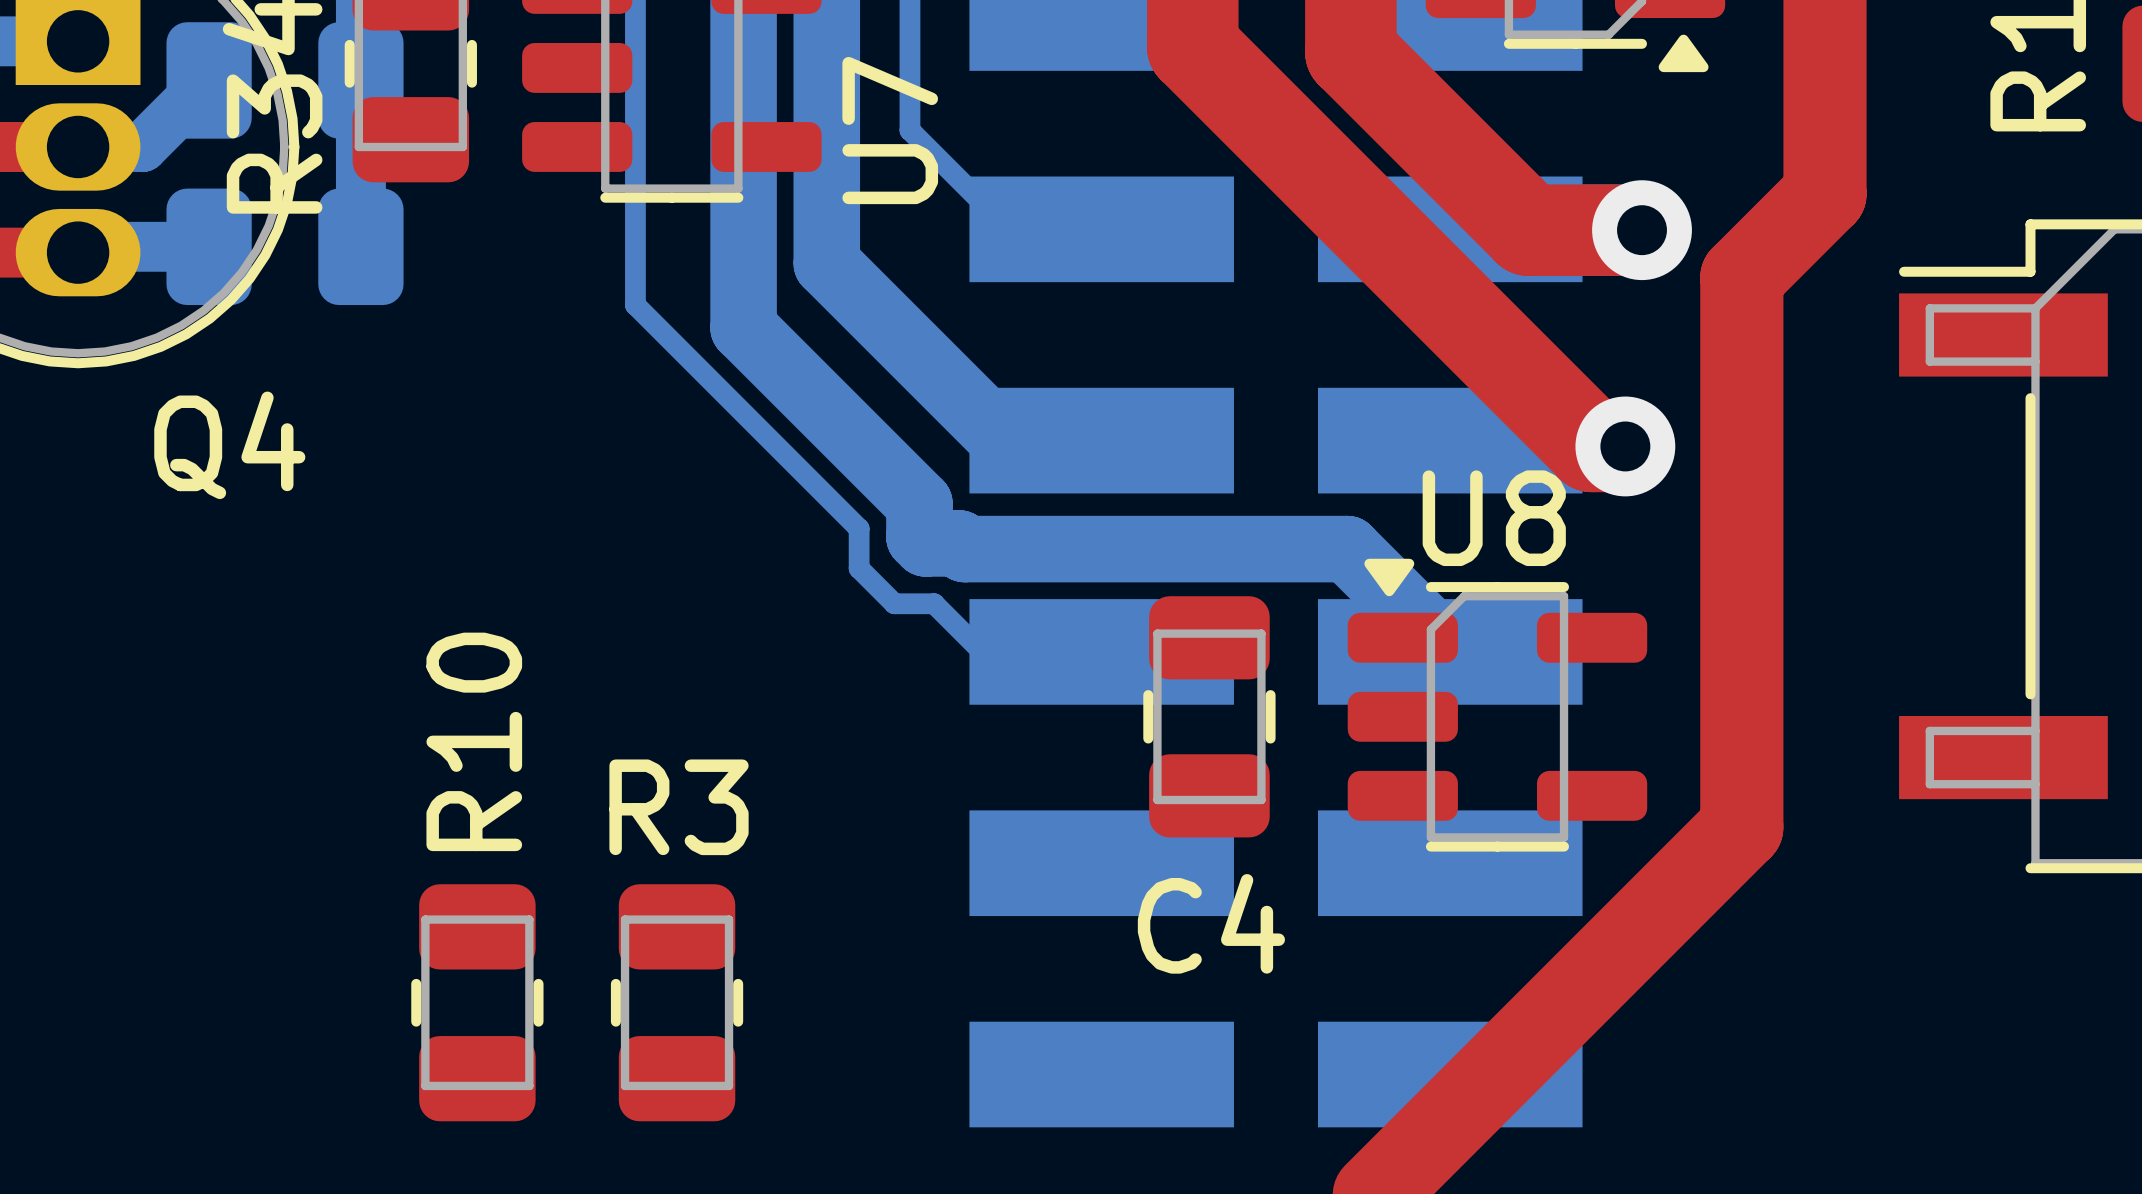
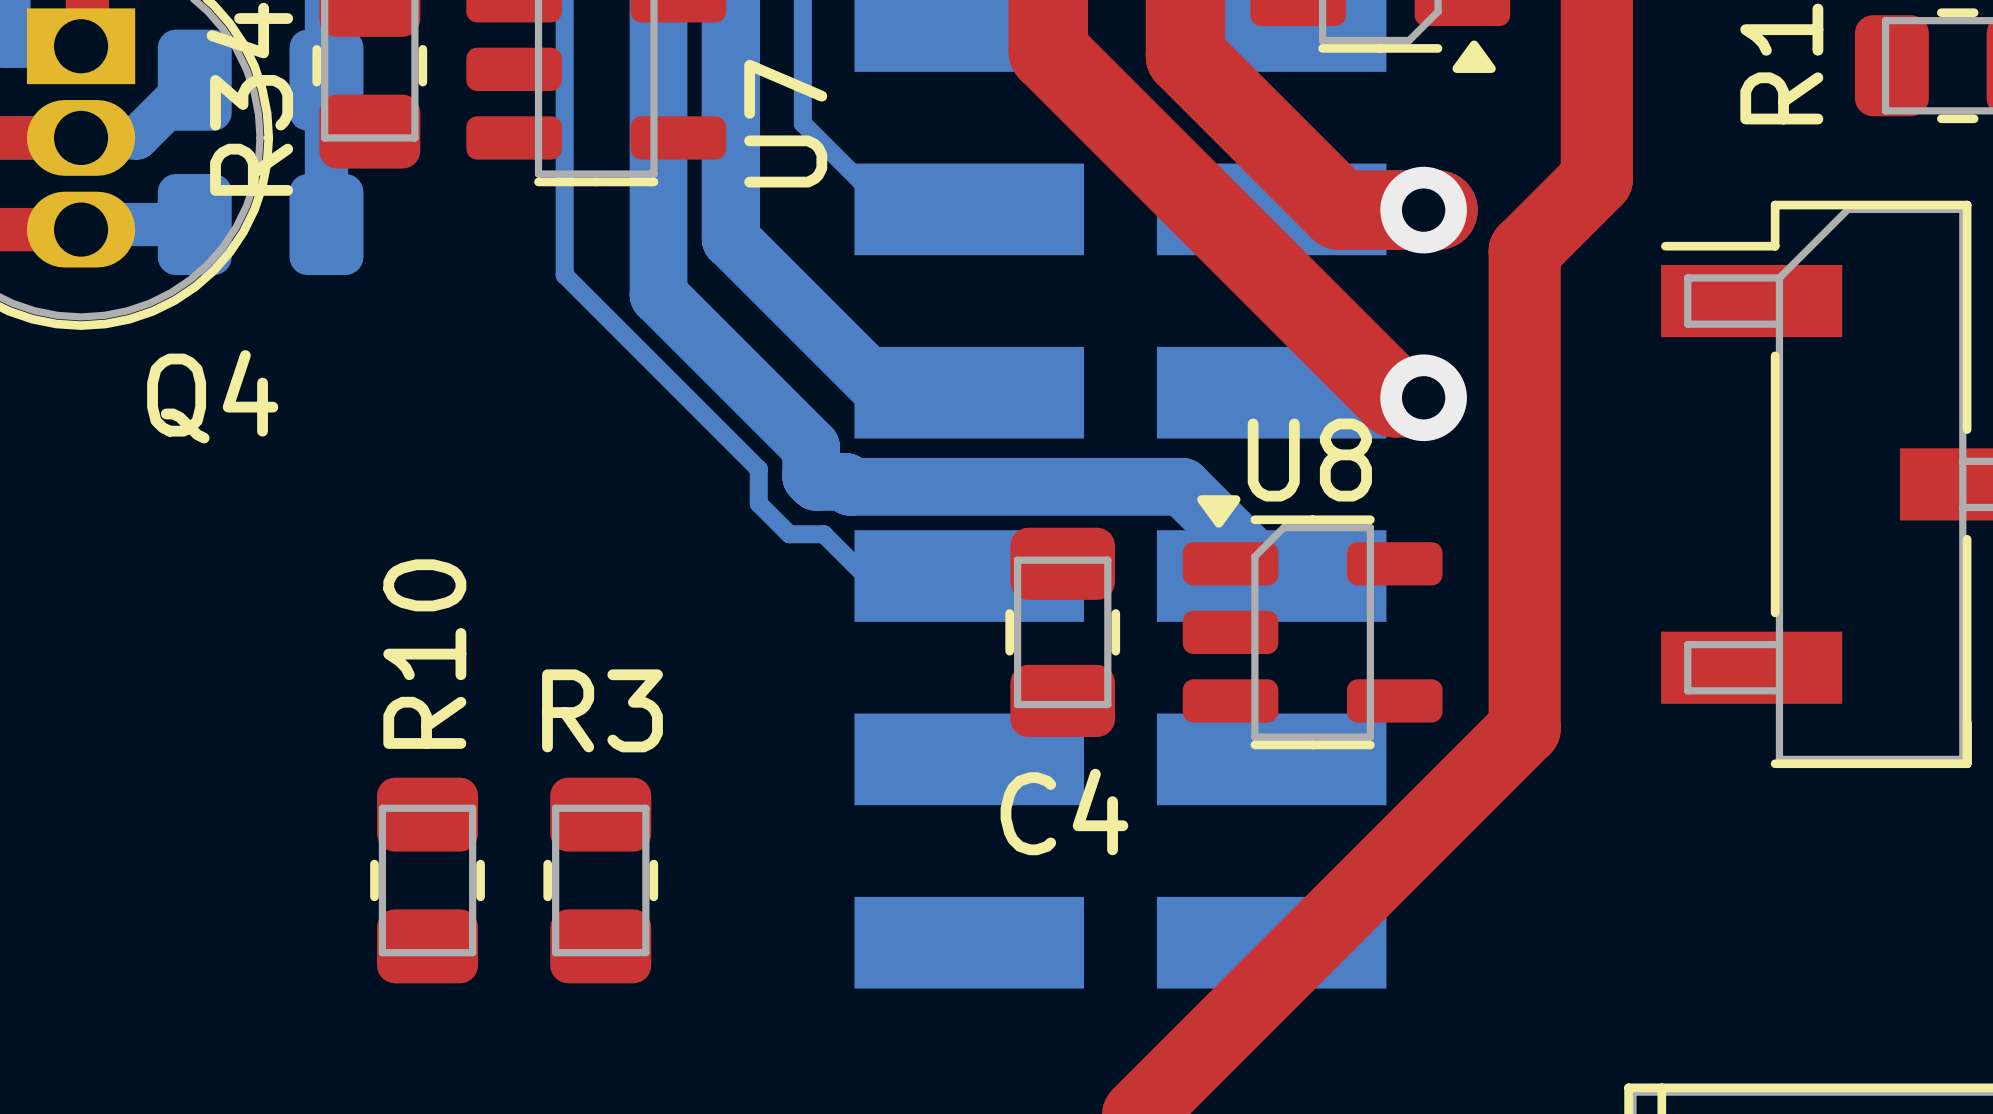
via position: (1642, 230) -> (1423, 210)

